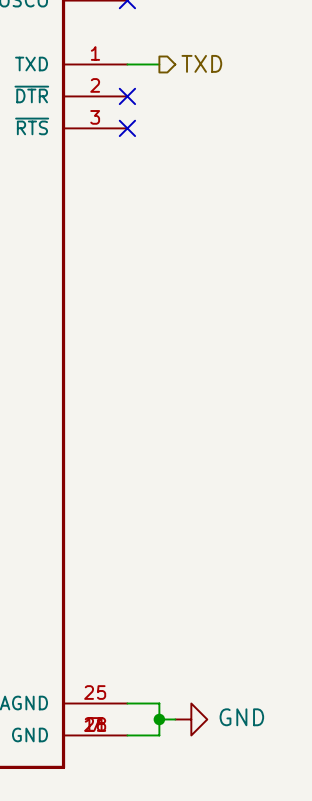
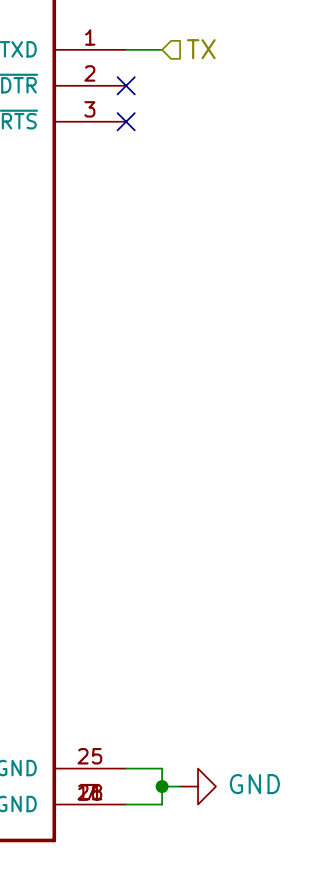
hierarchical label shape: output (201, 63) -> input (201, 49)
hierarchical label: TXD (201, 63) -> TX (201, 49)

